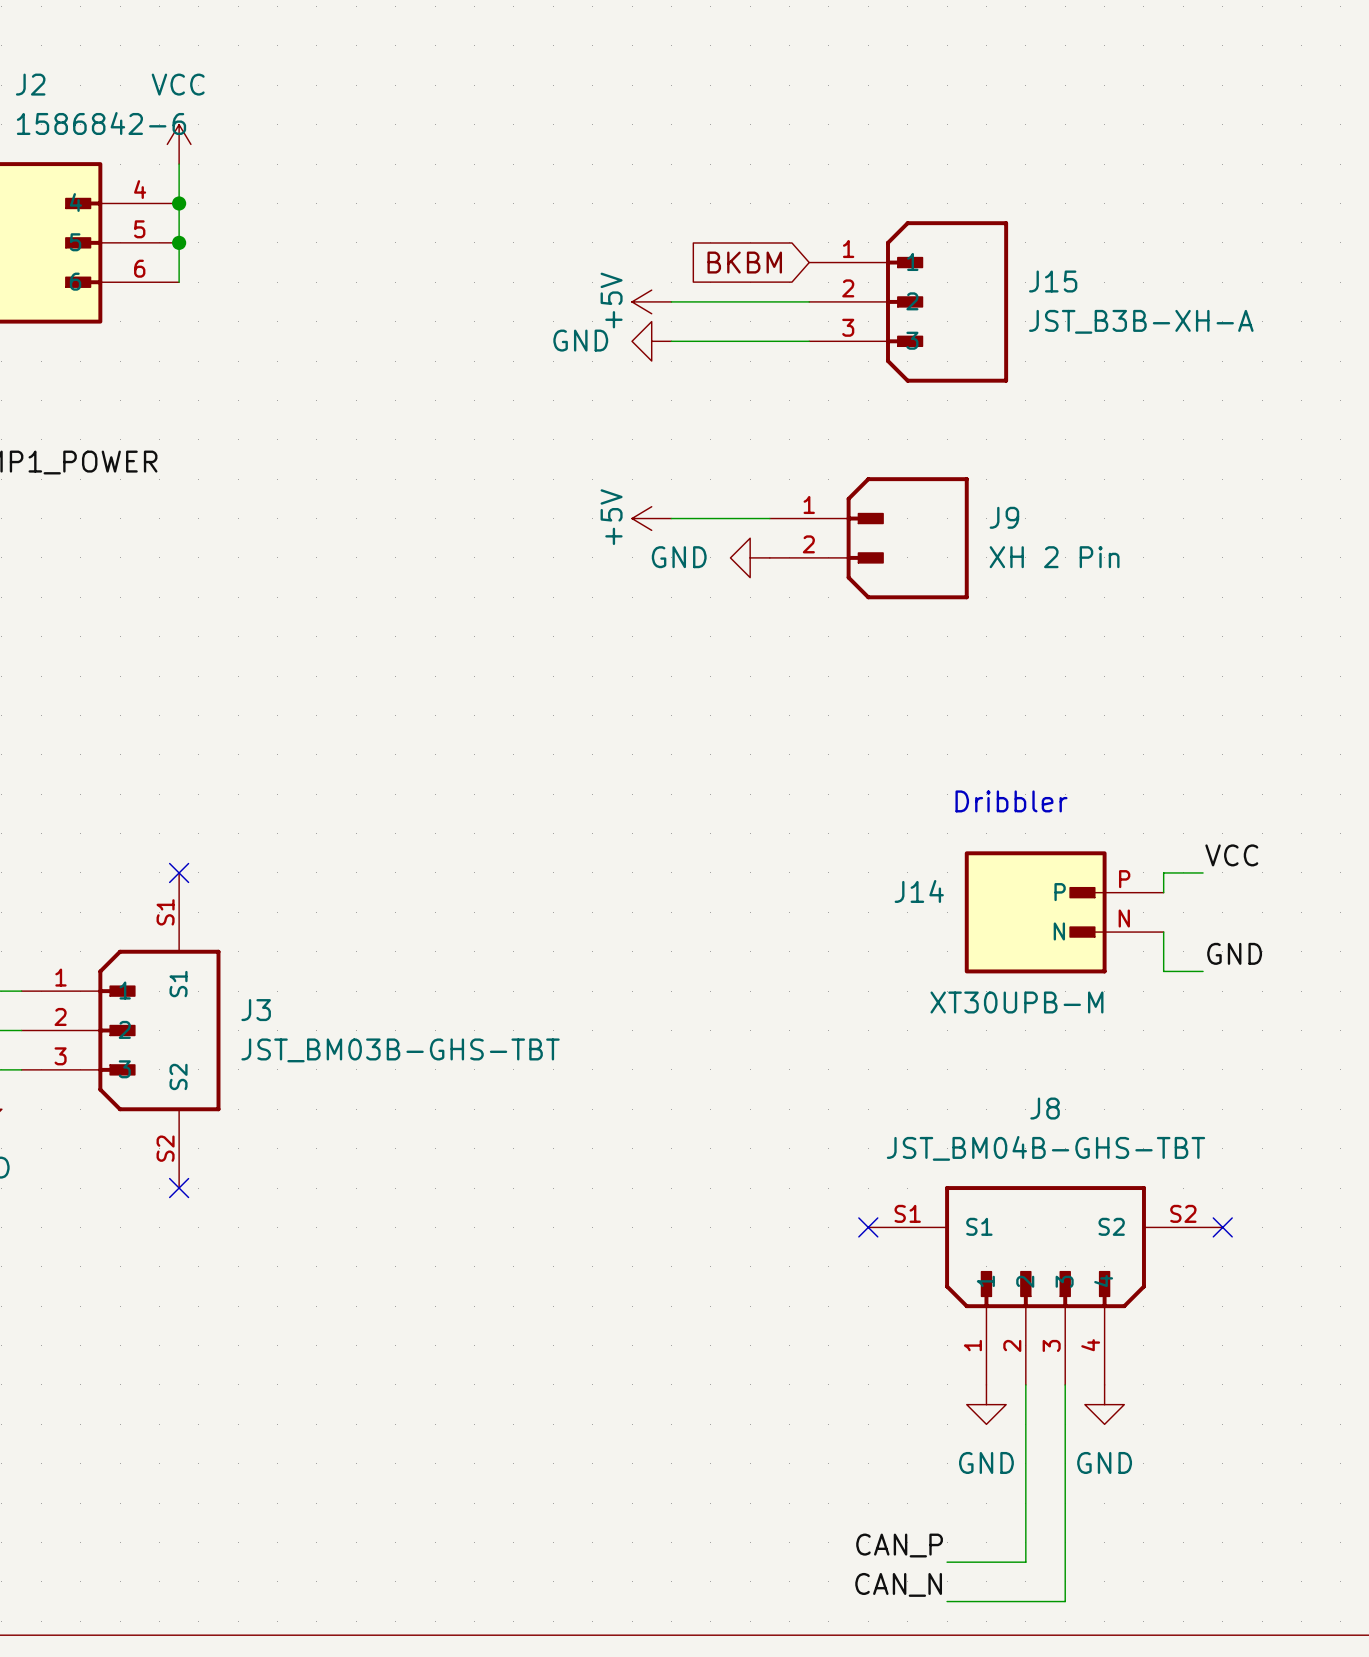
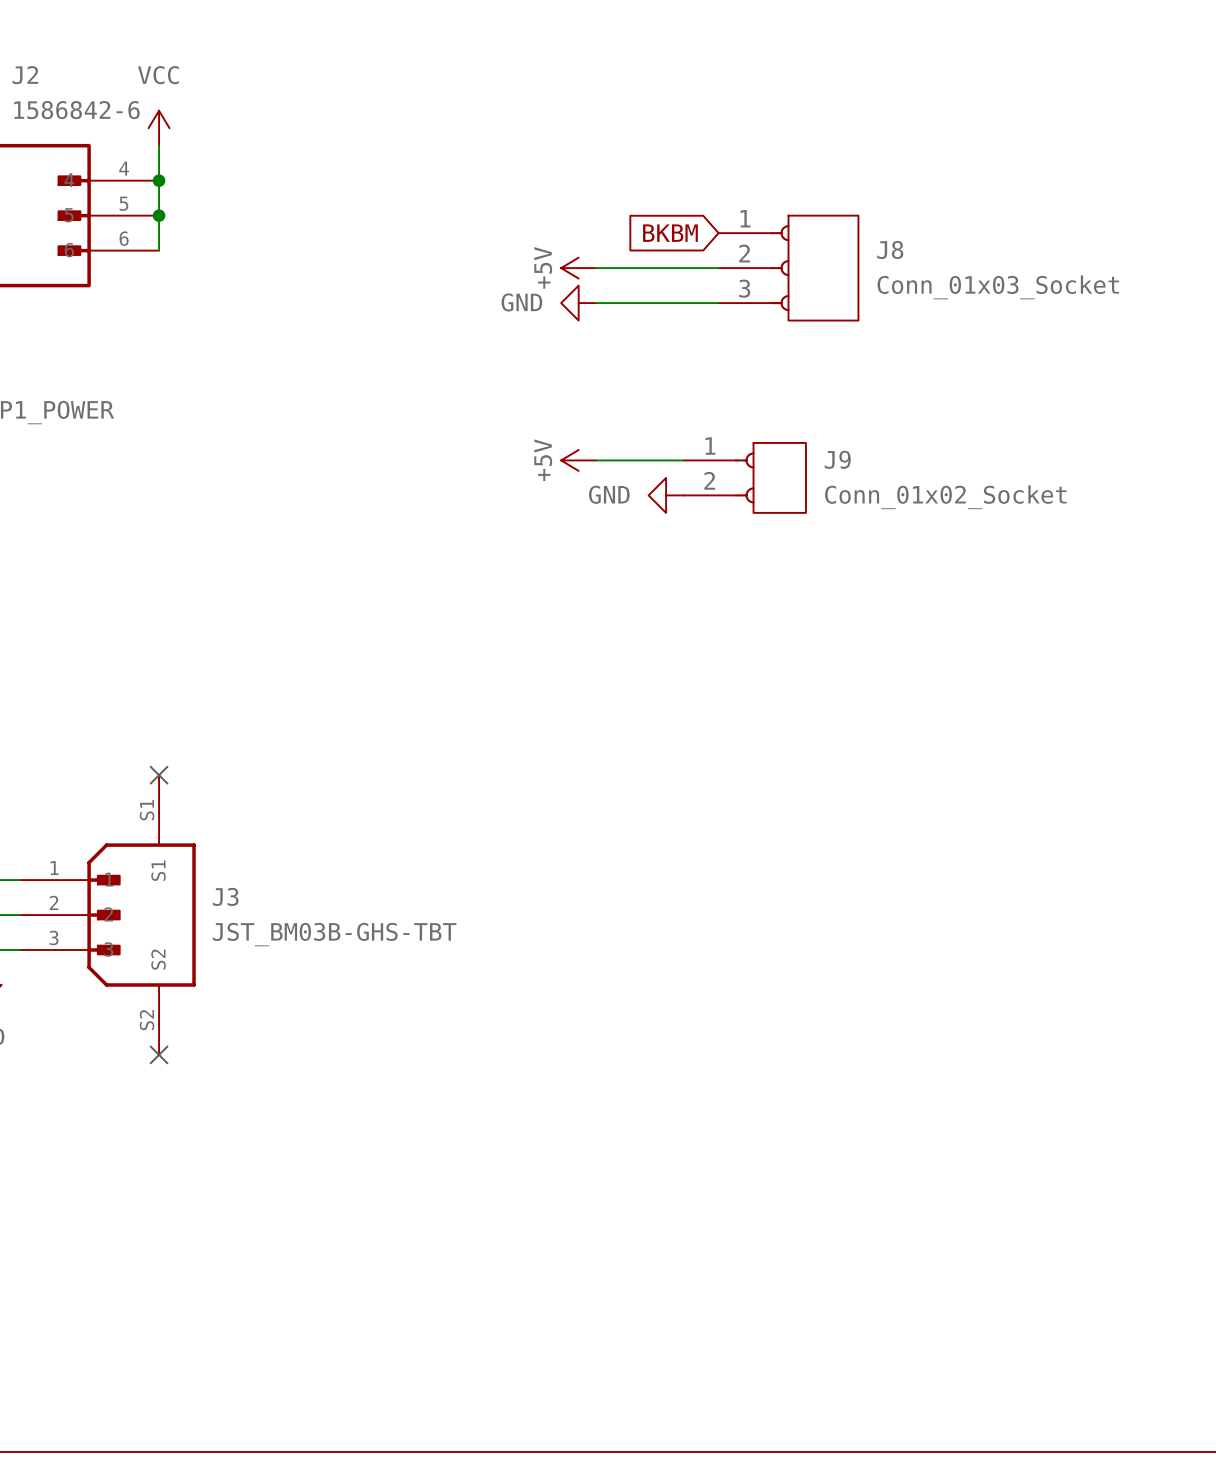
J15: JST_B3B-XH-A (908, 301) -> none
J9 symbol: [769, 477, 969, 600] -> [683, 442, 806, 513]
J9 value: XH 2 Pin (1054, 557) -> Conn_01x02_Socket (945, 497)
text: Dribbler (1011, 801) -> none
label: VCC (1231, 855) -> none
wire: (1203, 872) (1163, 872) (1163, 892) -> none
J14: XT30UPB-M (1064, 912) -> none
wire: (1163, 932) (1163, 971) (1203, 971) -> none
label: GND (1234, 953) -> none
J8 name position: J8 (1045, 1108) -> J8 (890, 249)
J8 value: JST_BM04B-GHS-TBT (1045, 1148) -> Conn_01x03_Socket (998, 287)
J8 symbol: [868, 1186, 1223, 1385] -> [718, 215, 859, 321]
no-connect mark: (868, 1227) -> none
no-connect mark: (1222, 1227) -> none
wire: (1025, 1384) (1025, 1562) (947, 1562) -> none
wire: (1065, 1384) (1065, 1601) (947, 1601) -> none
power symbol: GND (986, 1404) -> none
power symbol: GND (1104, 1404) -> none
label: CAN_P (899, 1545) -> none
label: CAN_N (898, 1584) -> none

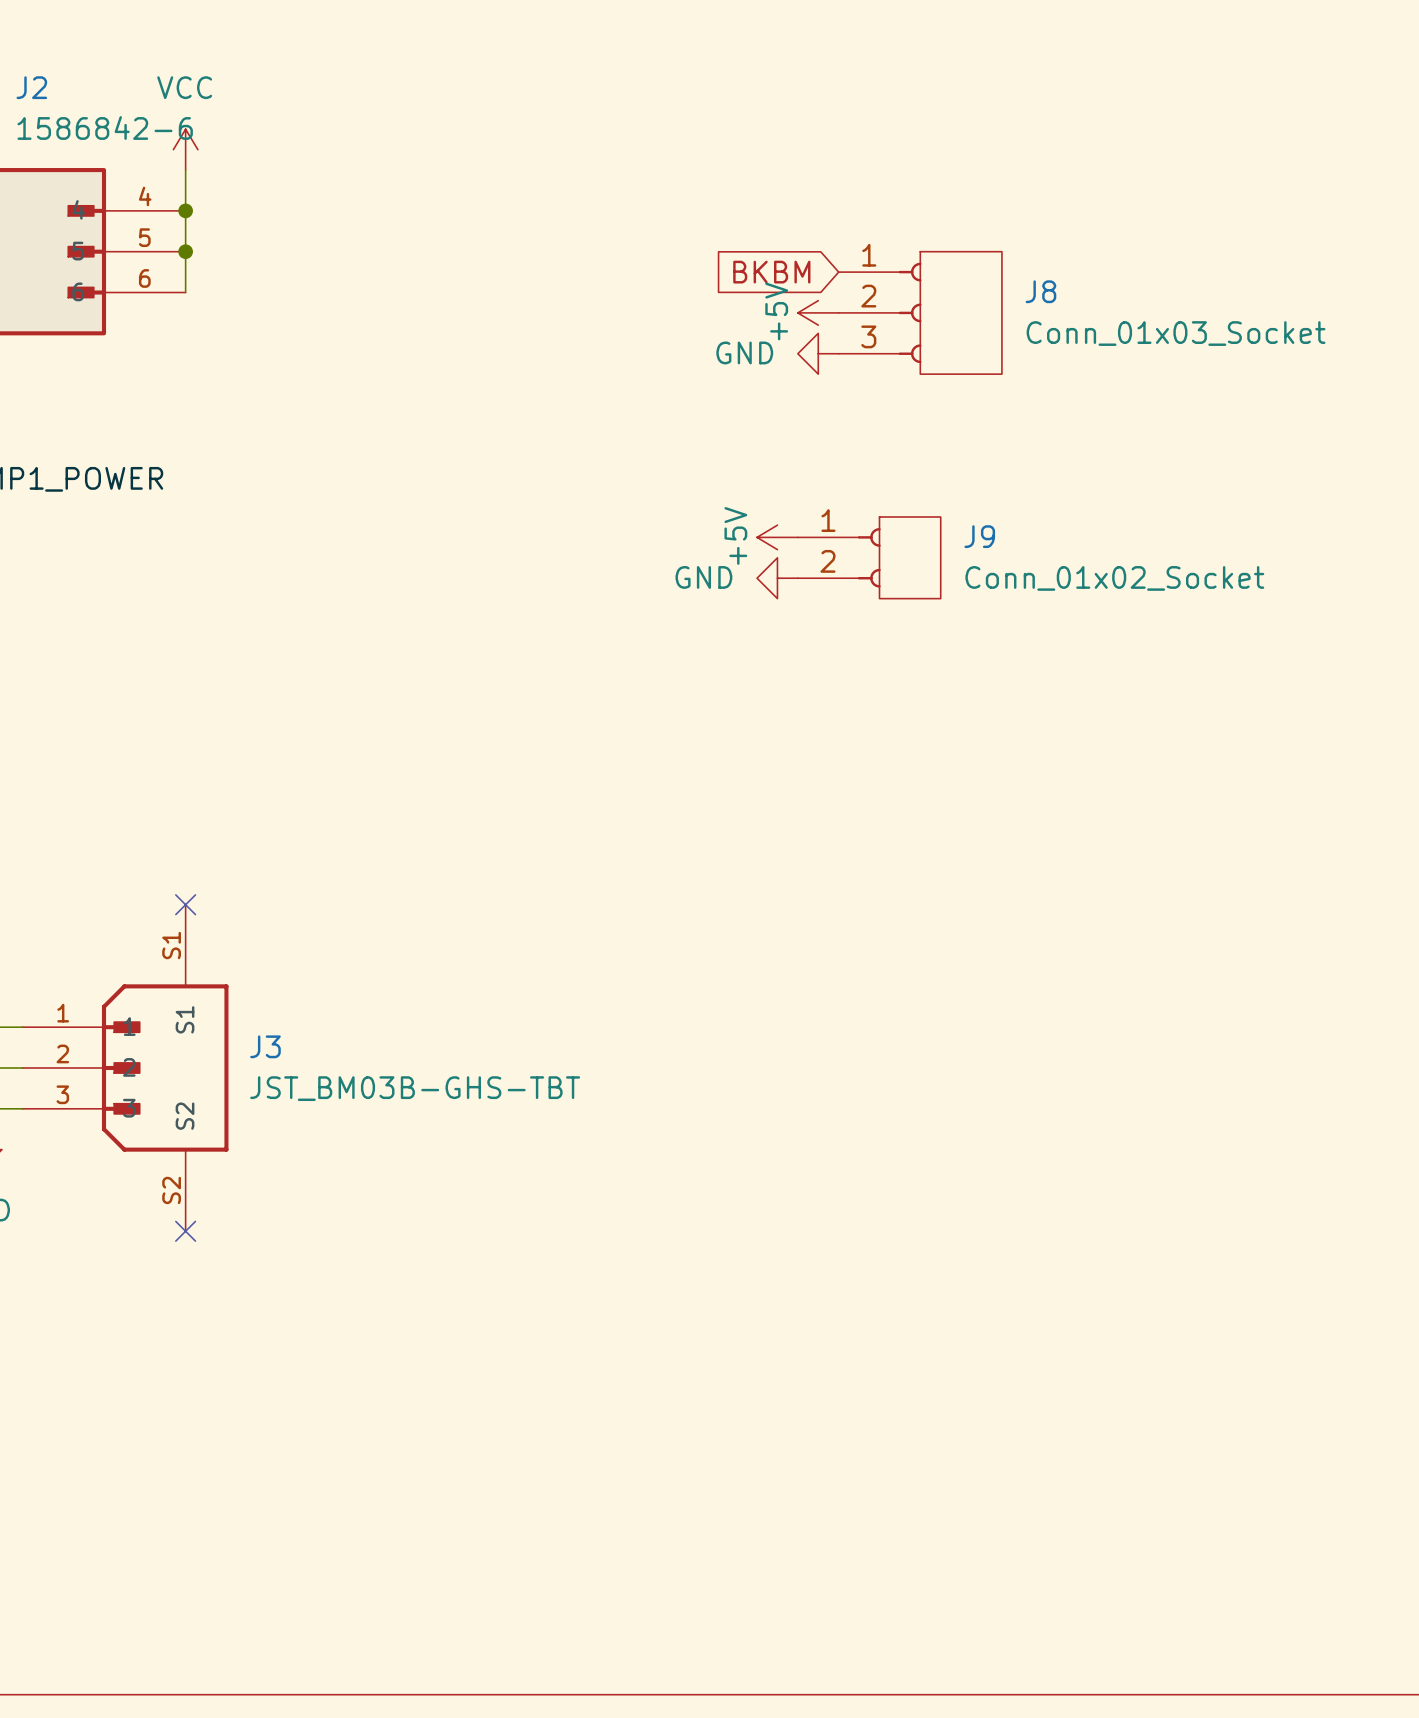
power symbol: +5V (578, 268) -> none
wire: (596, 268) (718, 268) -> none
power symbol: none -> +5V (818, 312)
power symbol position: GND (578, 303) -> GND (818, 353)
wire: (596, 303) (718, 303) -> none
power symbol position: +5V (578, 460) -> +5V (777, 537)
wire: (596, 460) (683, 460) -> none

